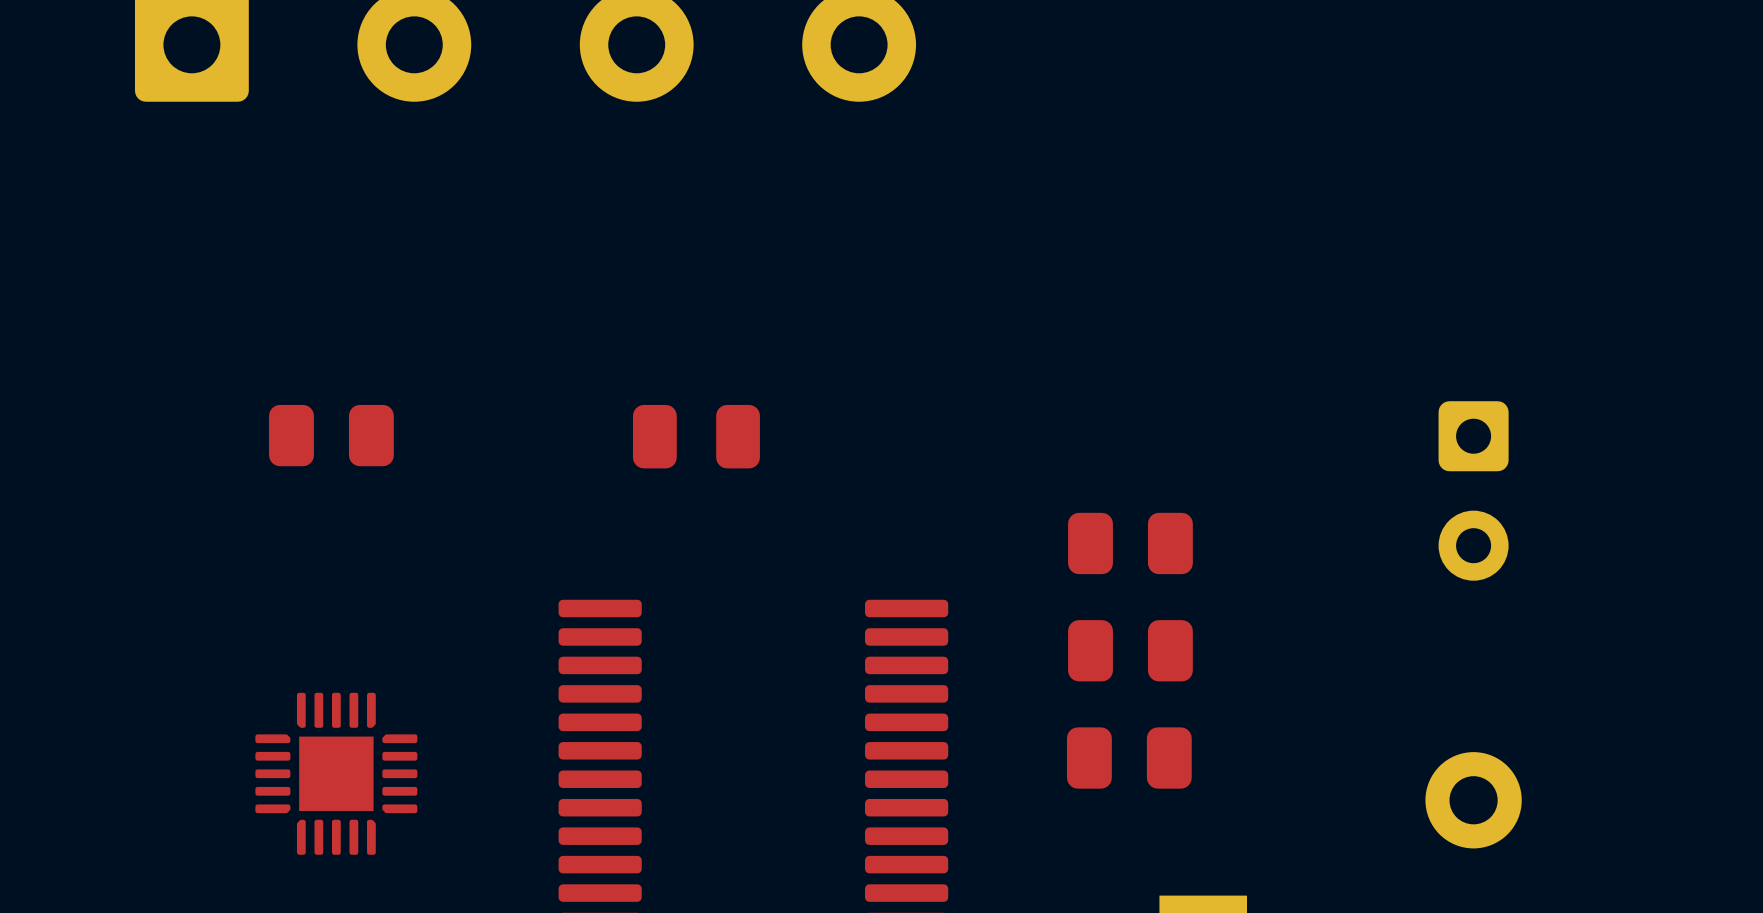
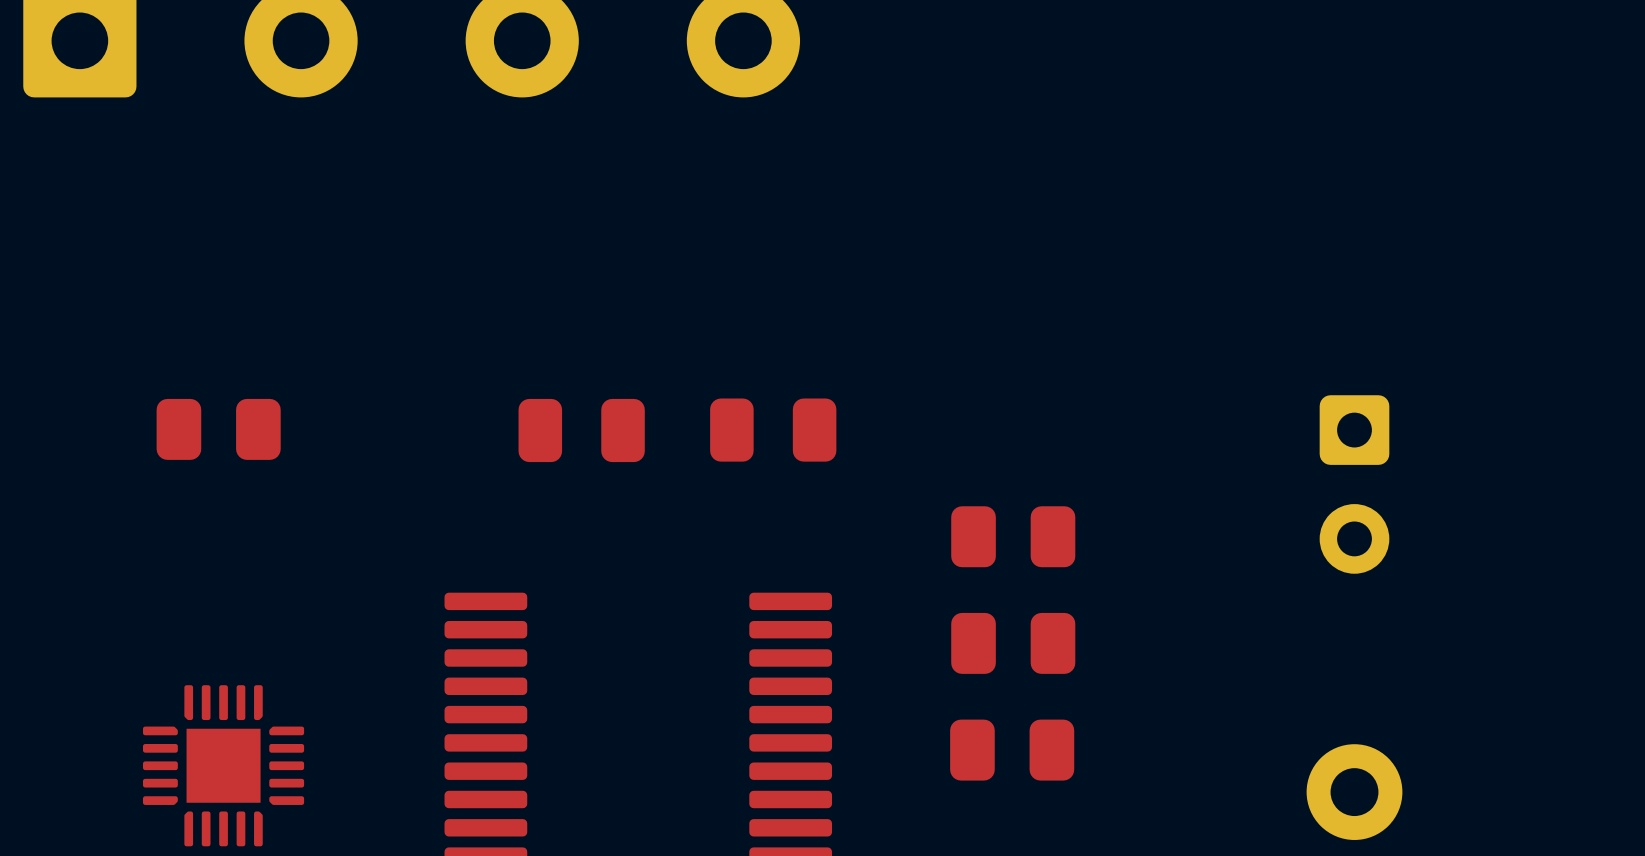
part: none -> (773, 430)

